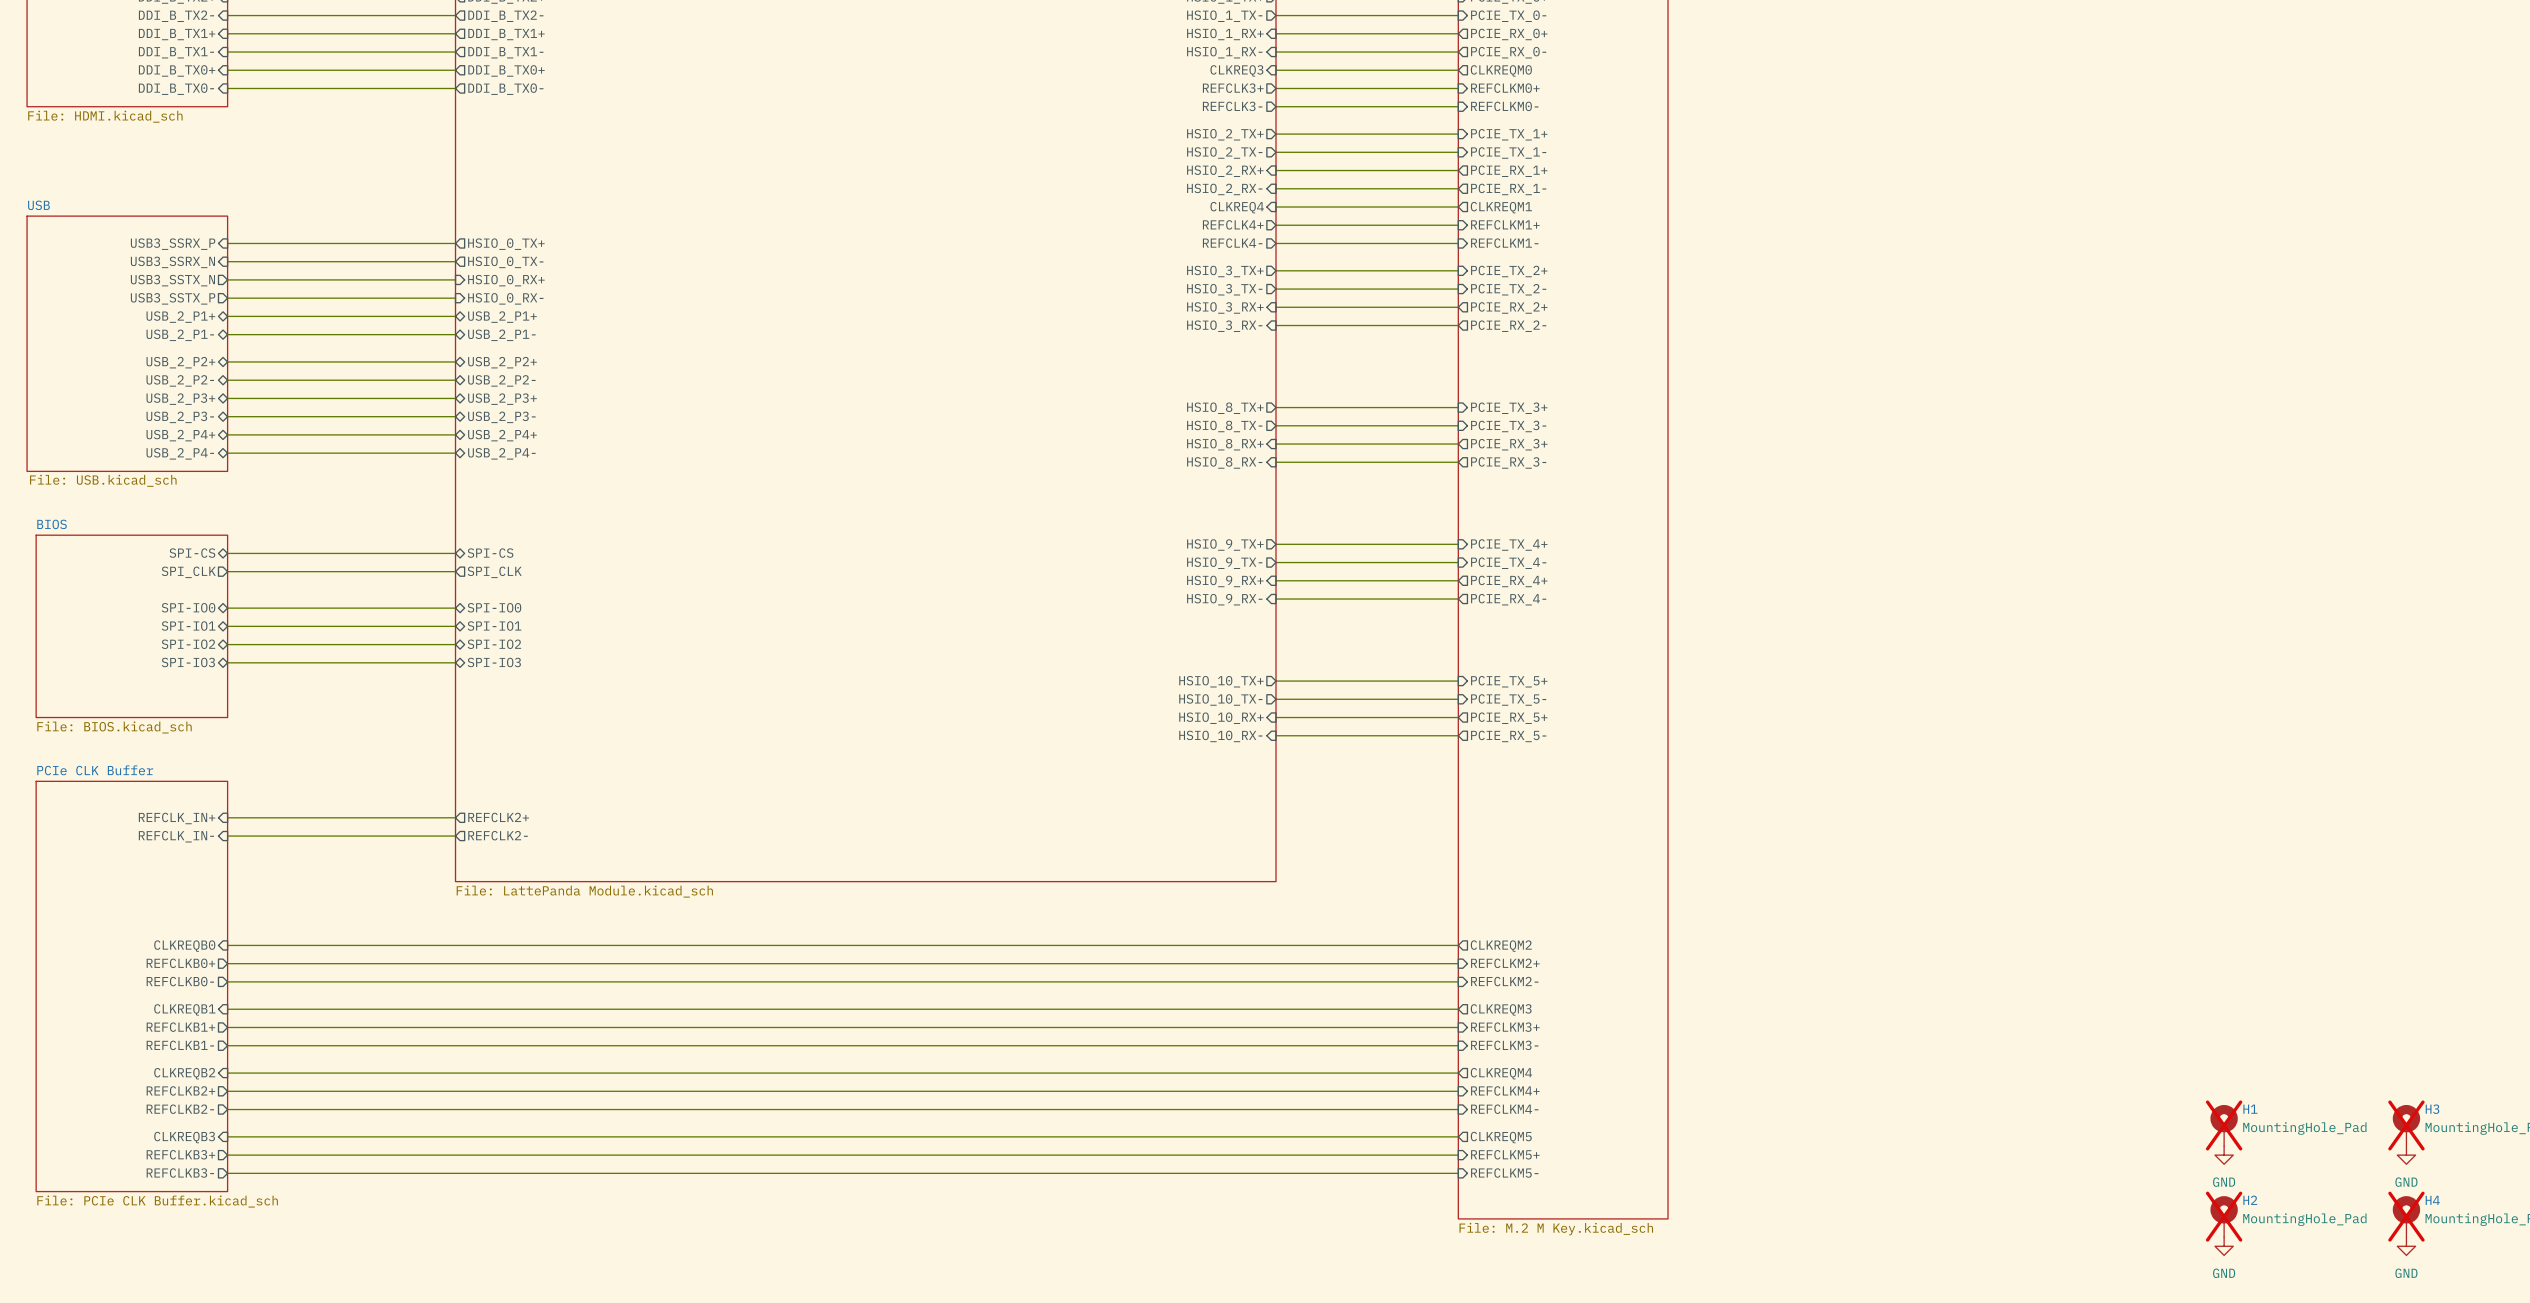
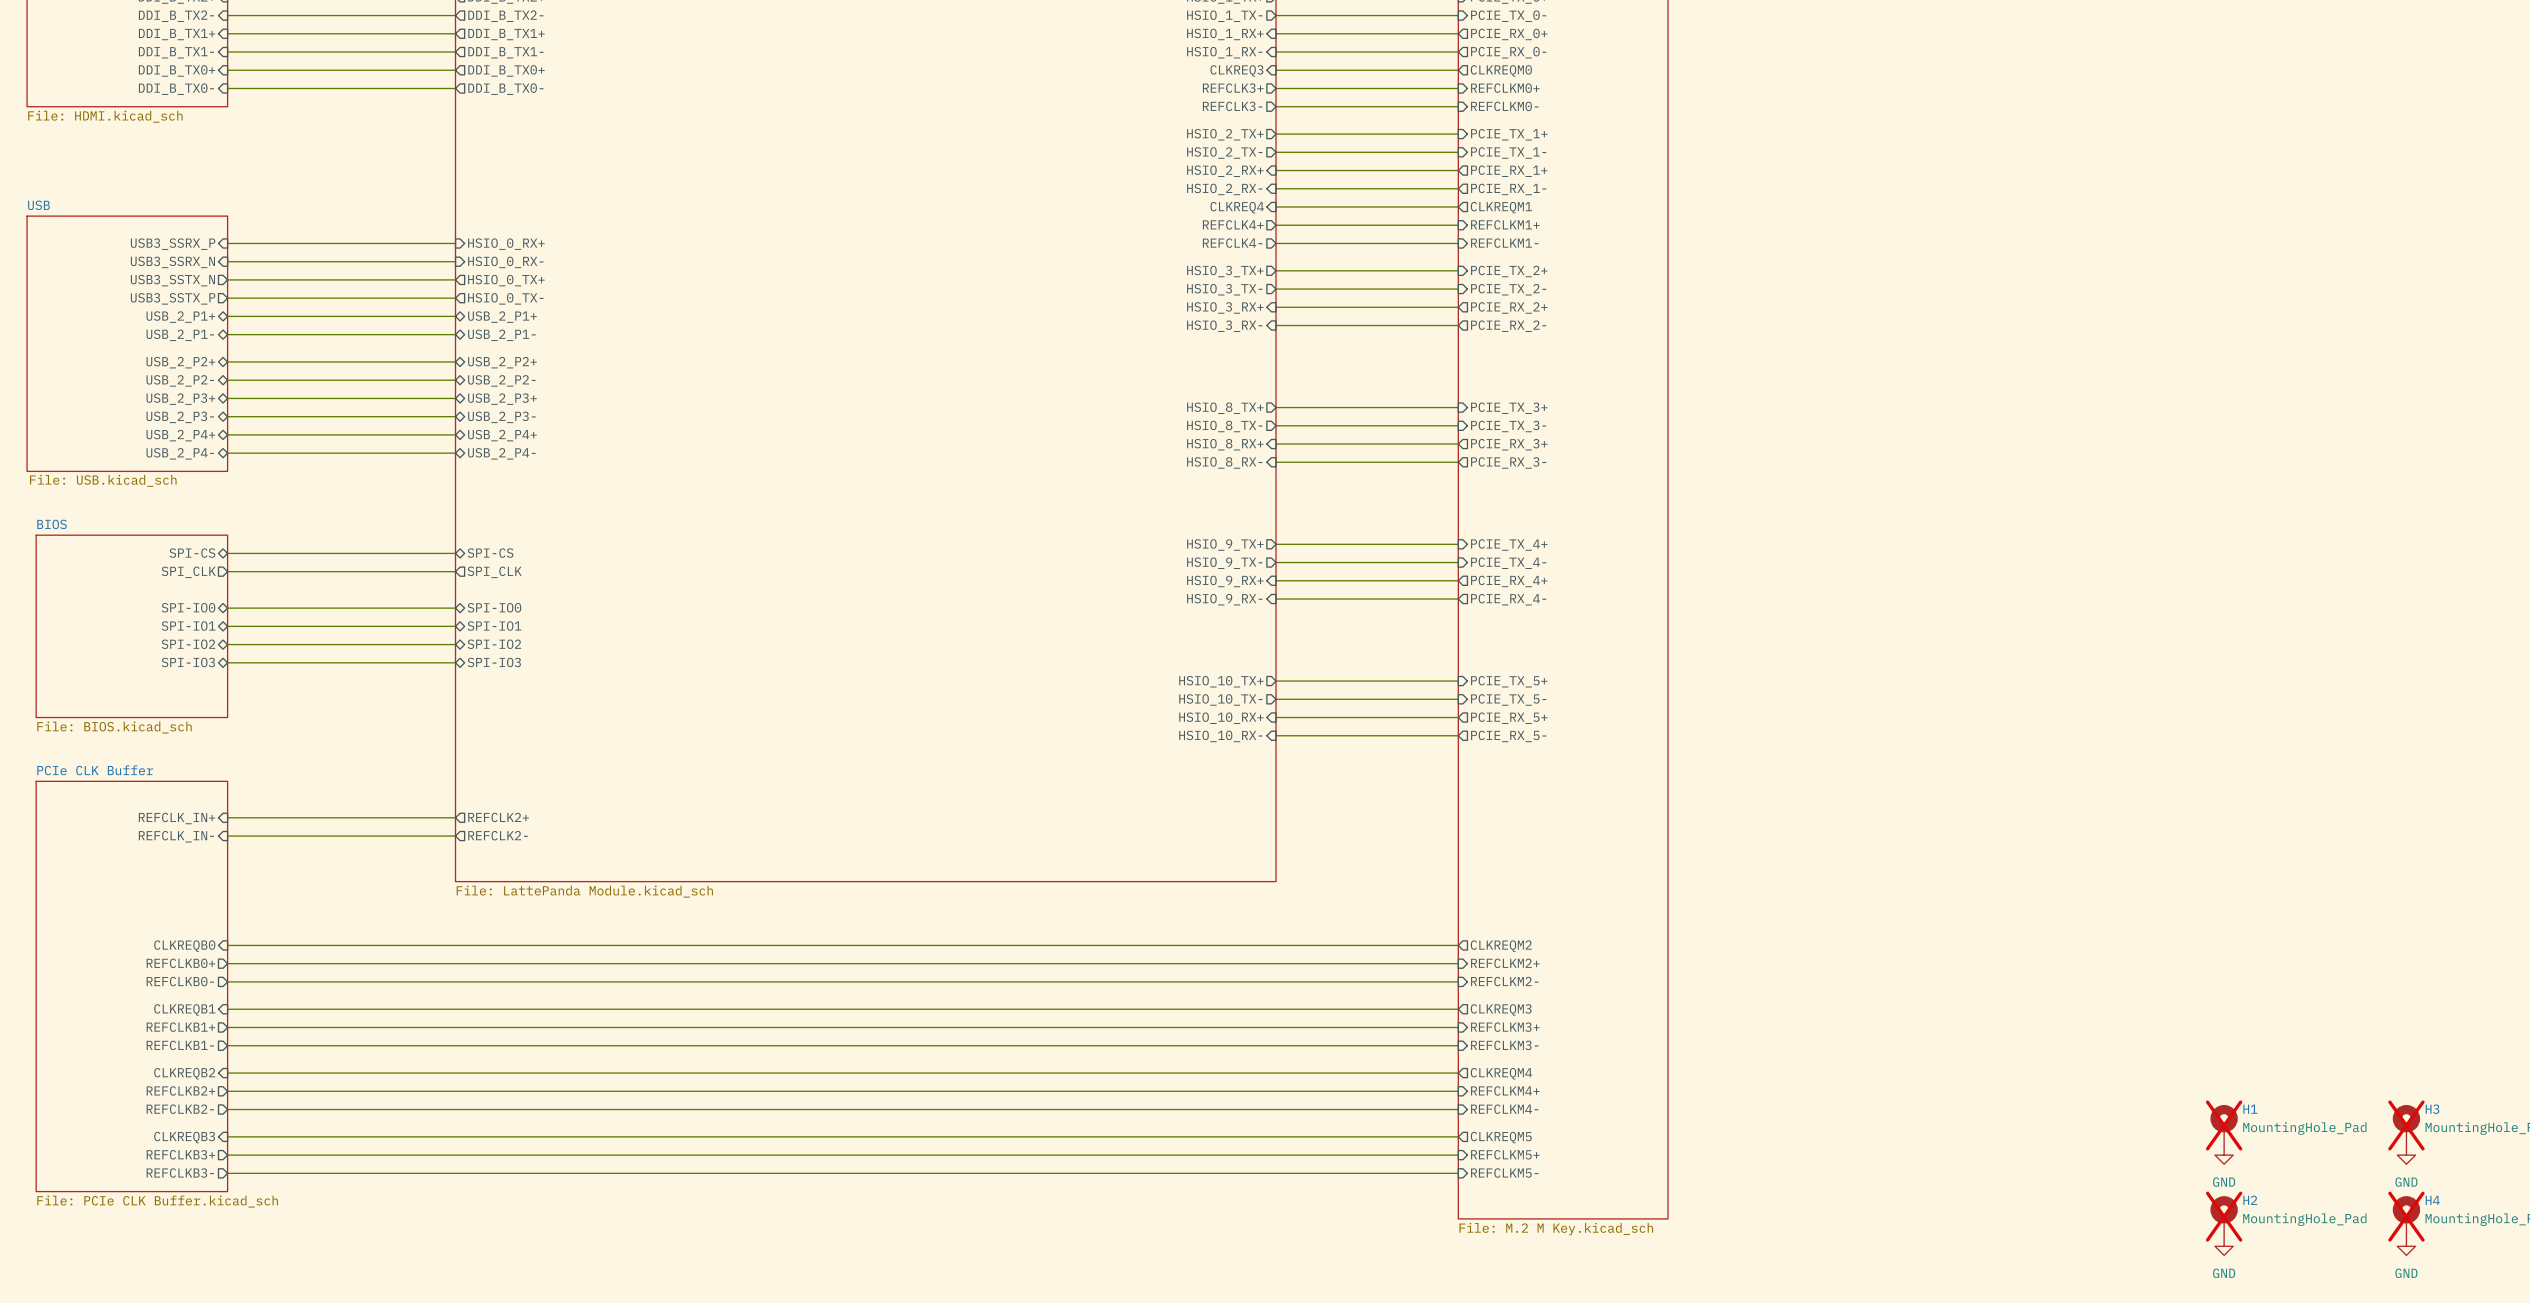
sheet pin shape: output (506, 244) -> input (506, 244)
sheet pin: HSIO_0_TX+ (506, 244) -> HSIO_0_RX+ (506, 244)
sheet pin shape: output (505, 262) -> input (505, 262)
sheet pin: HSIO_0_TX- (505, 262) -> HSIO_0_RX- (505, 262)
sheet pin shape: input (506, 280) -> output (506, 280)
sheet pin: HSIO_0_RX+ (506, 280) -> HSIO_0_TX+ (506, 280)
sheet pin shape: input (505, 298) -> output (505, 298)
sheet pin: HSIO_0_RX- (505, 298) -> HSIO_0_TX- (505, 298)

